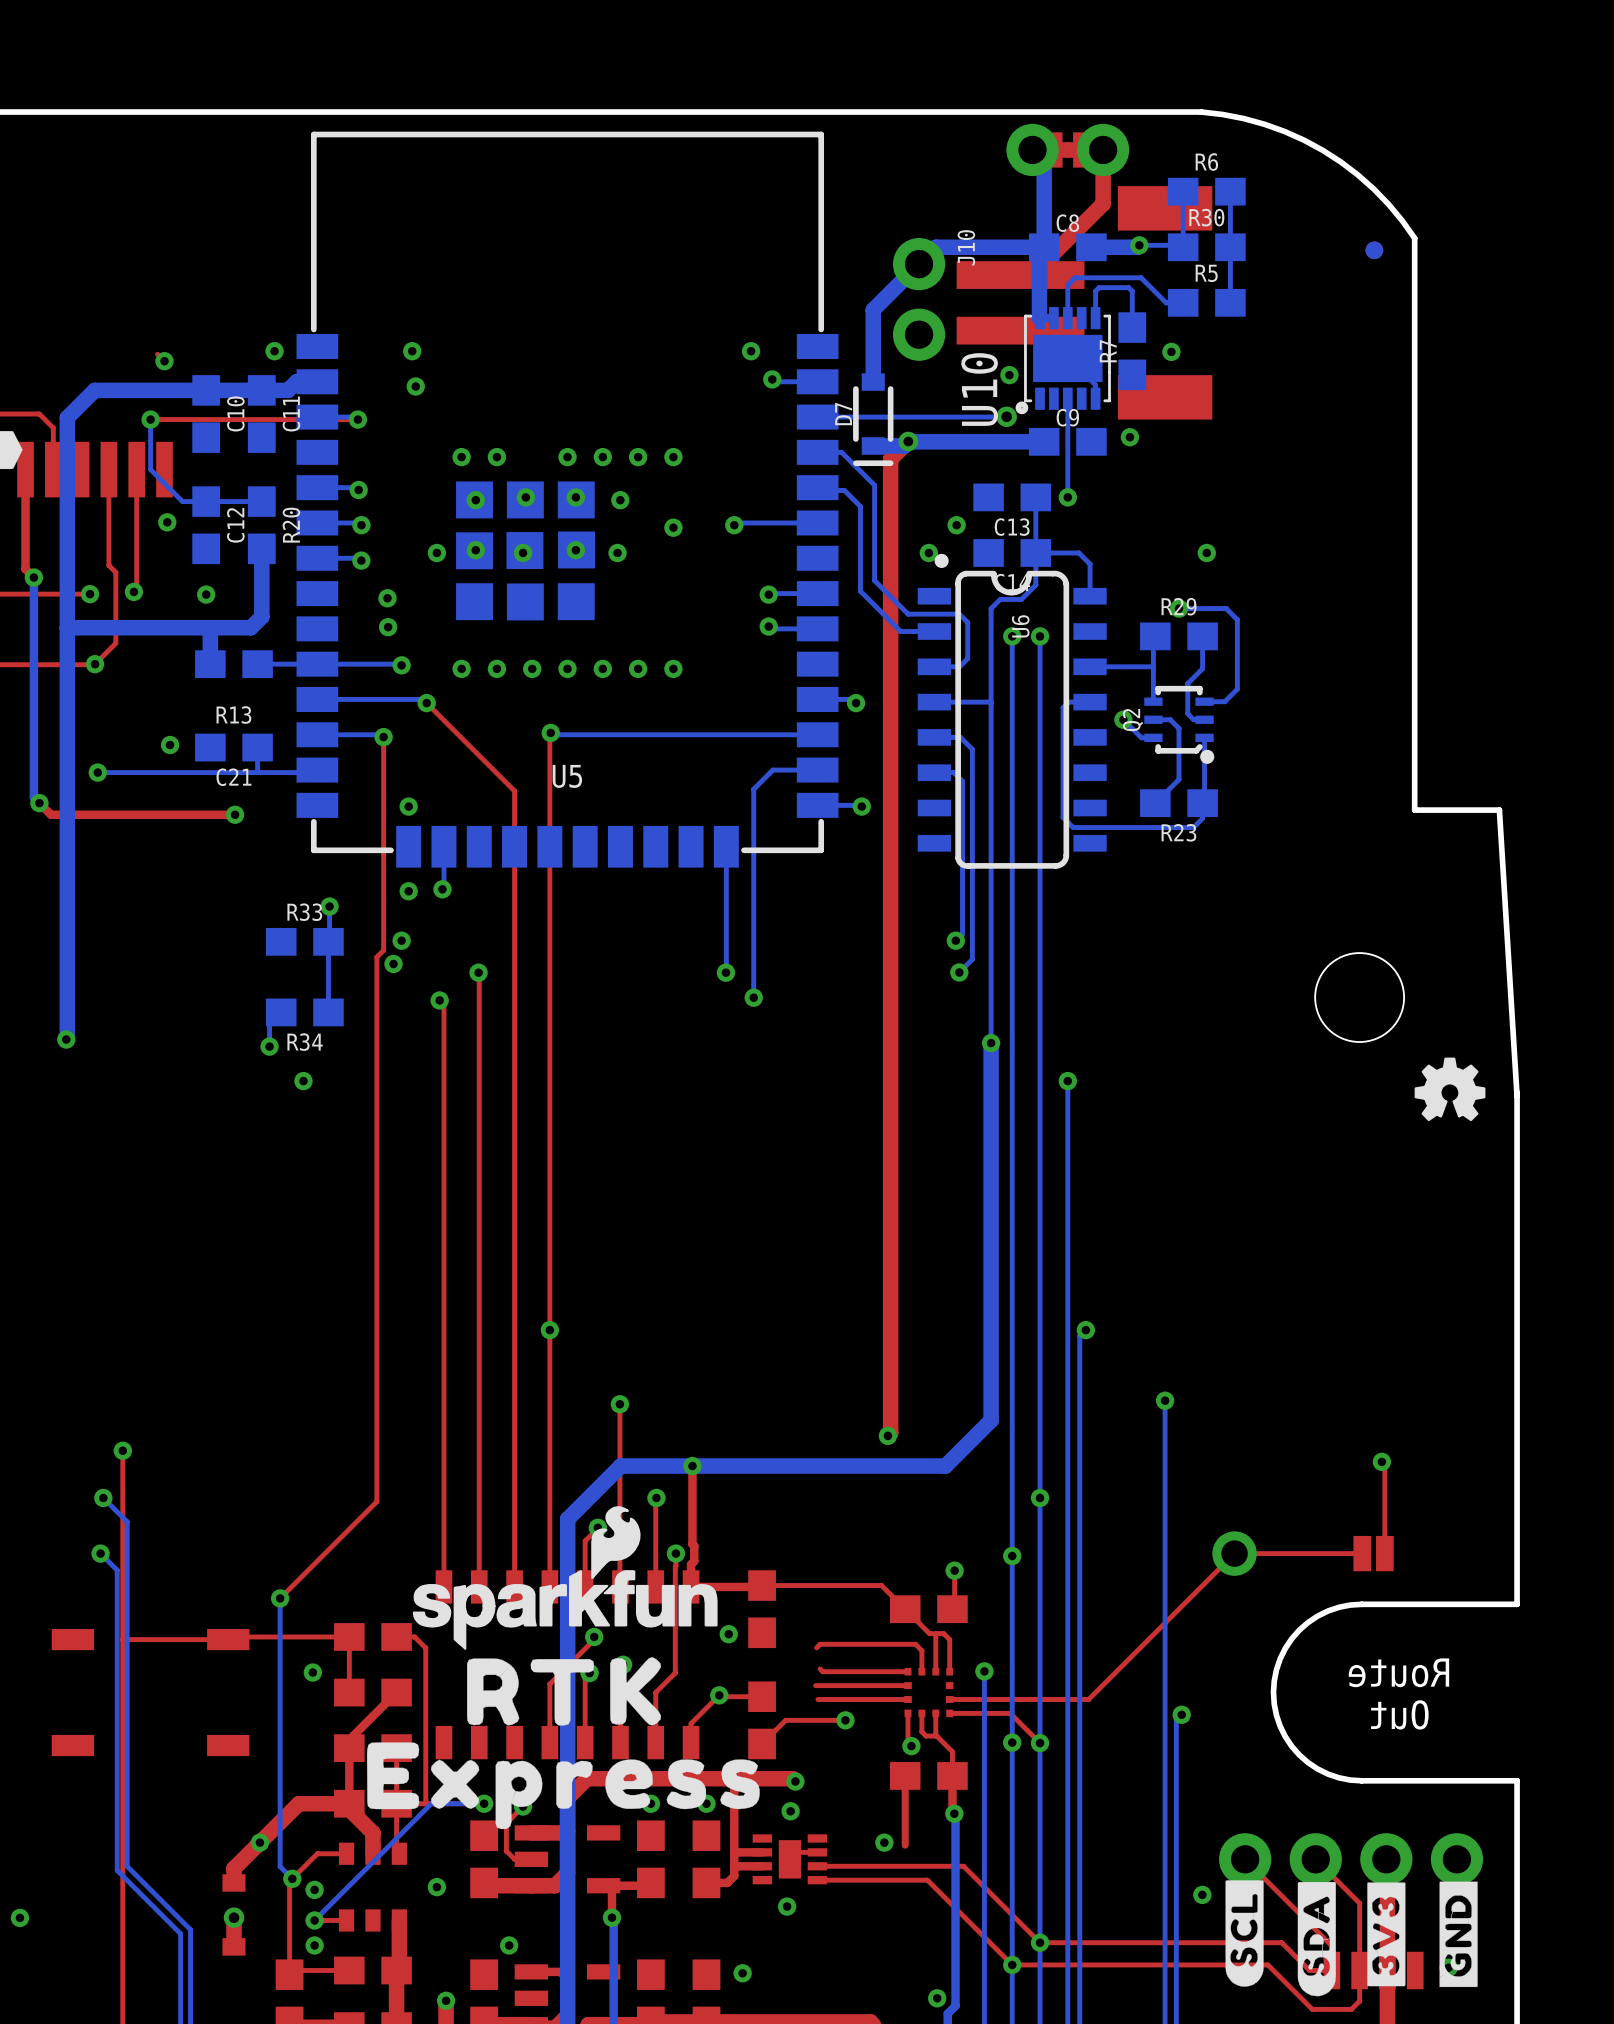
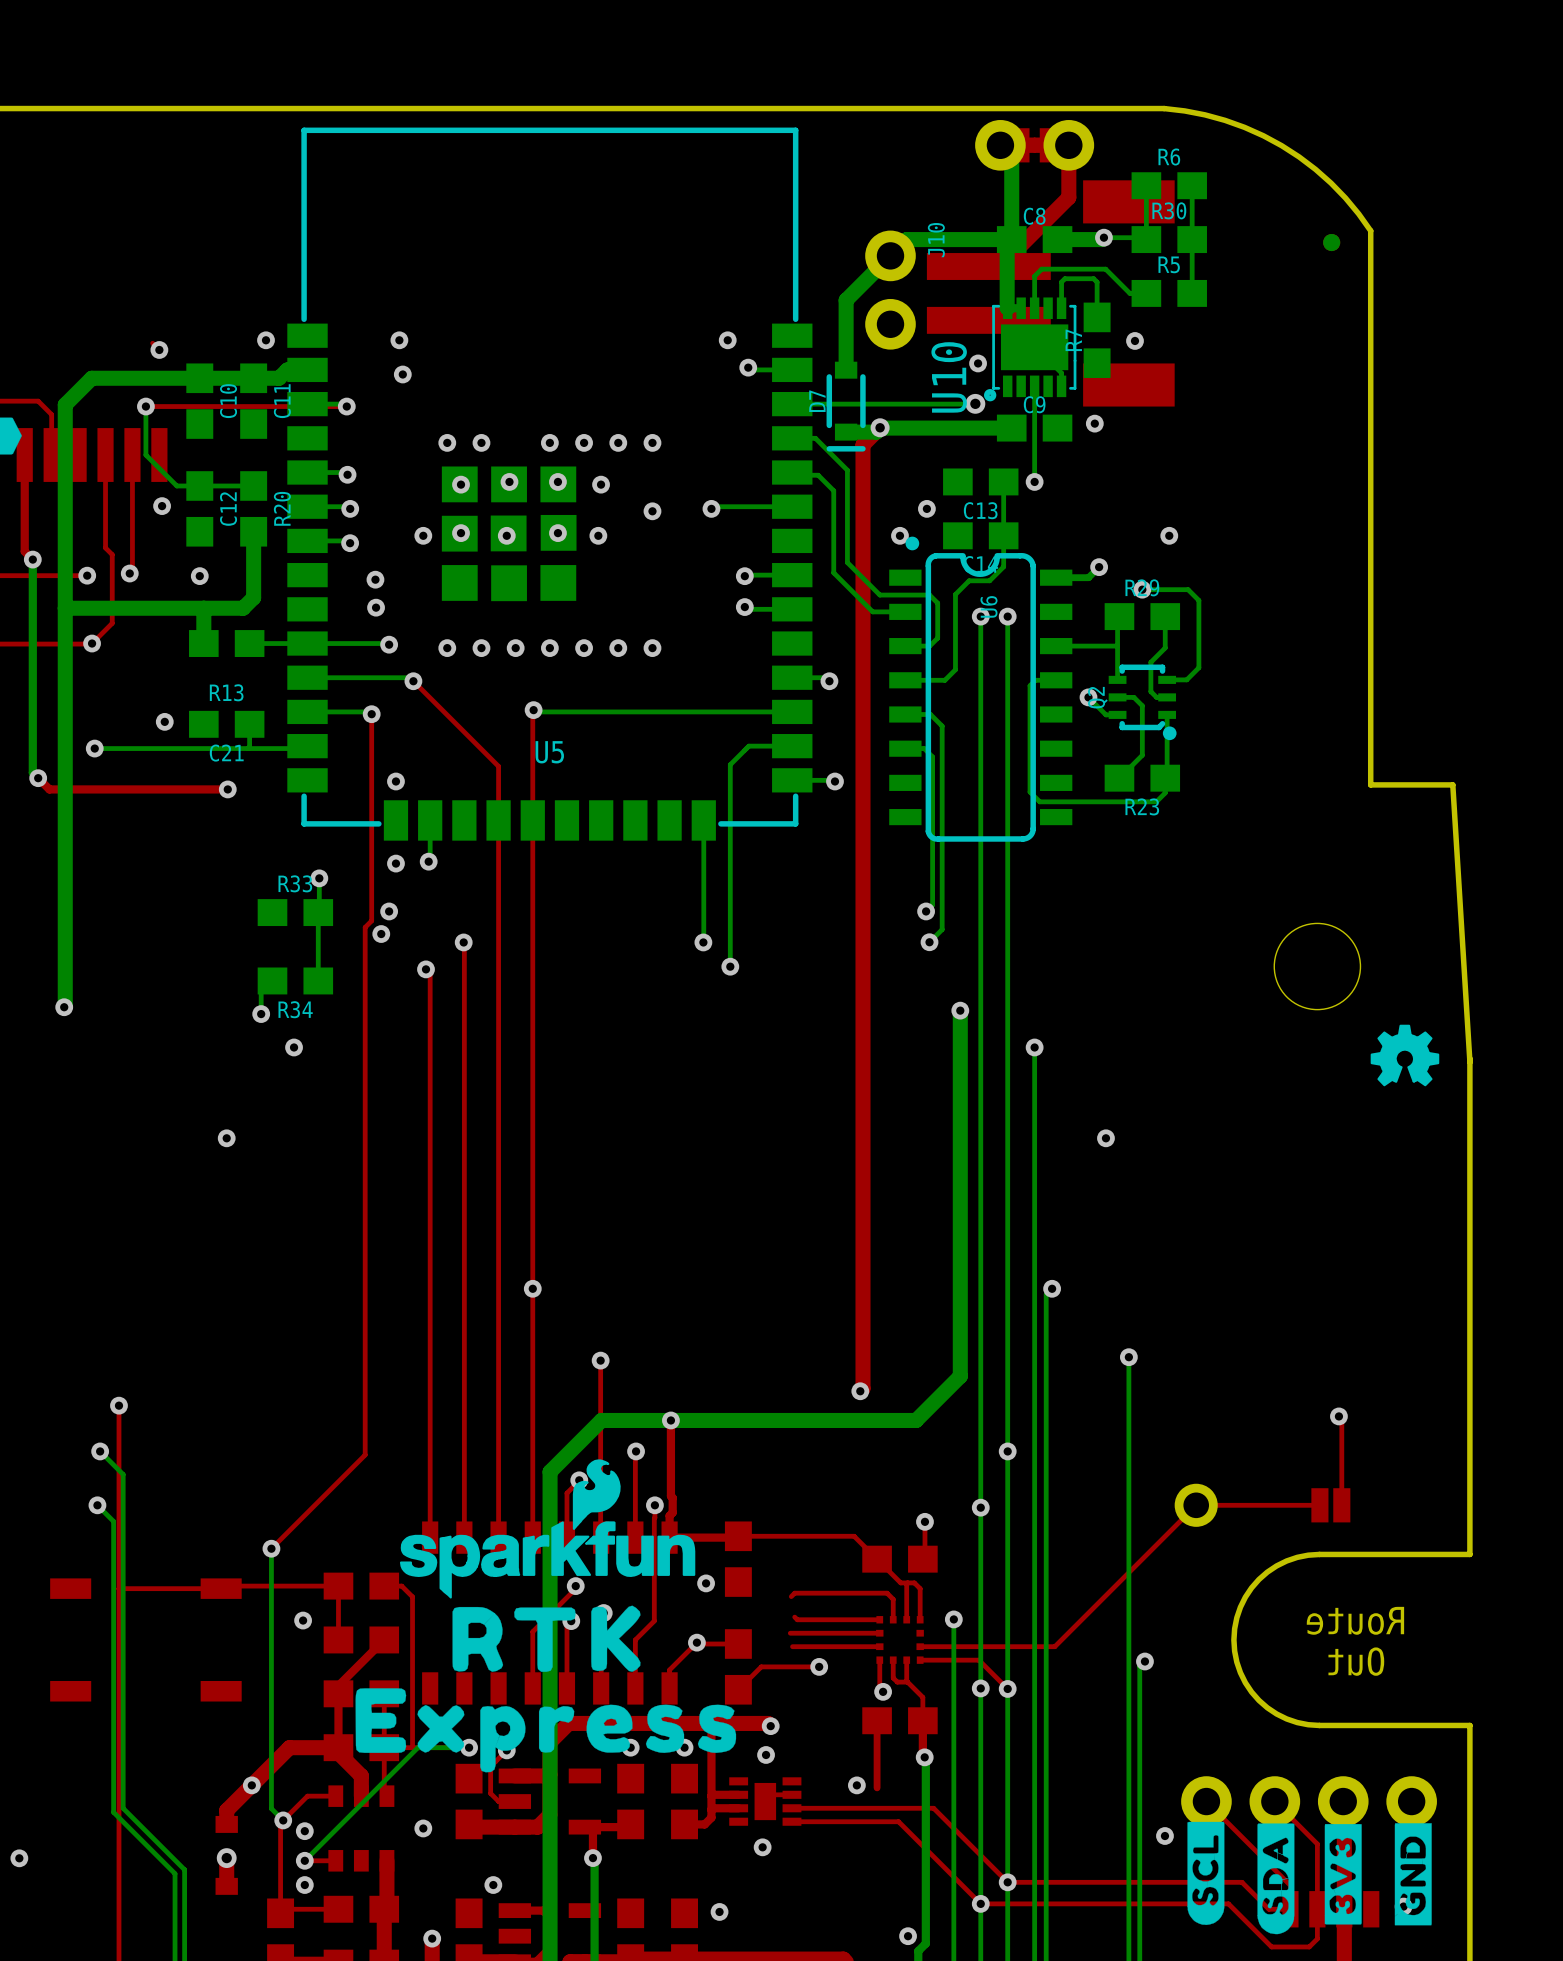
bottom track: (1035, 552) (1078, 552) (1090, 564) (1090, 596) -> (1099, 567) (1088, 577) (1056, 577)
via: none -> (1099, 567)
bottom track: (991, 608) (991, 1043) -> none
bottom track: (975, 702) (991, 703) -> (944, 680) (955, 669) (955, 594) (960, 589)
via: none -> (226, 1138)
via: none -> (1105, 1138)

